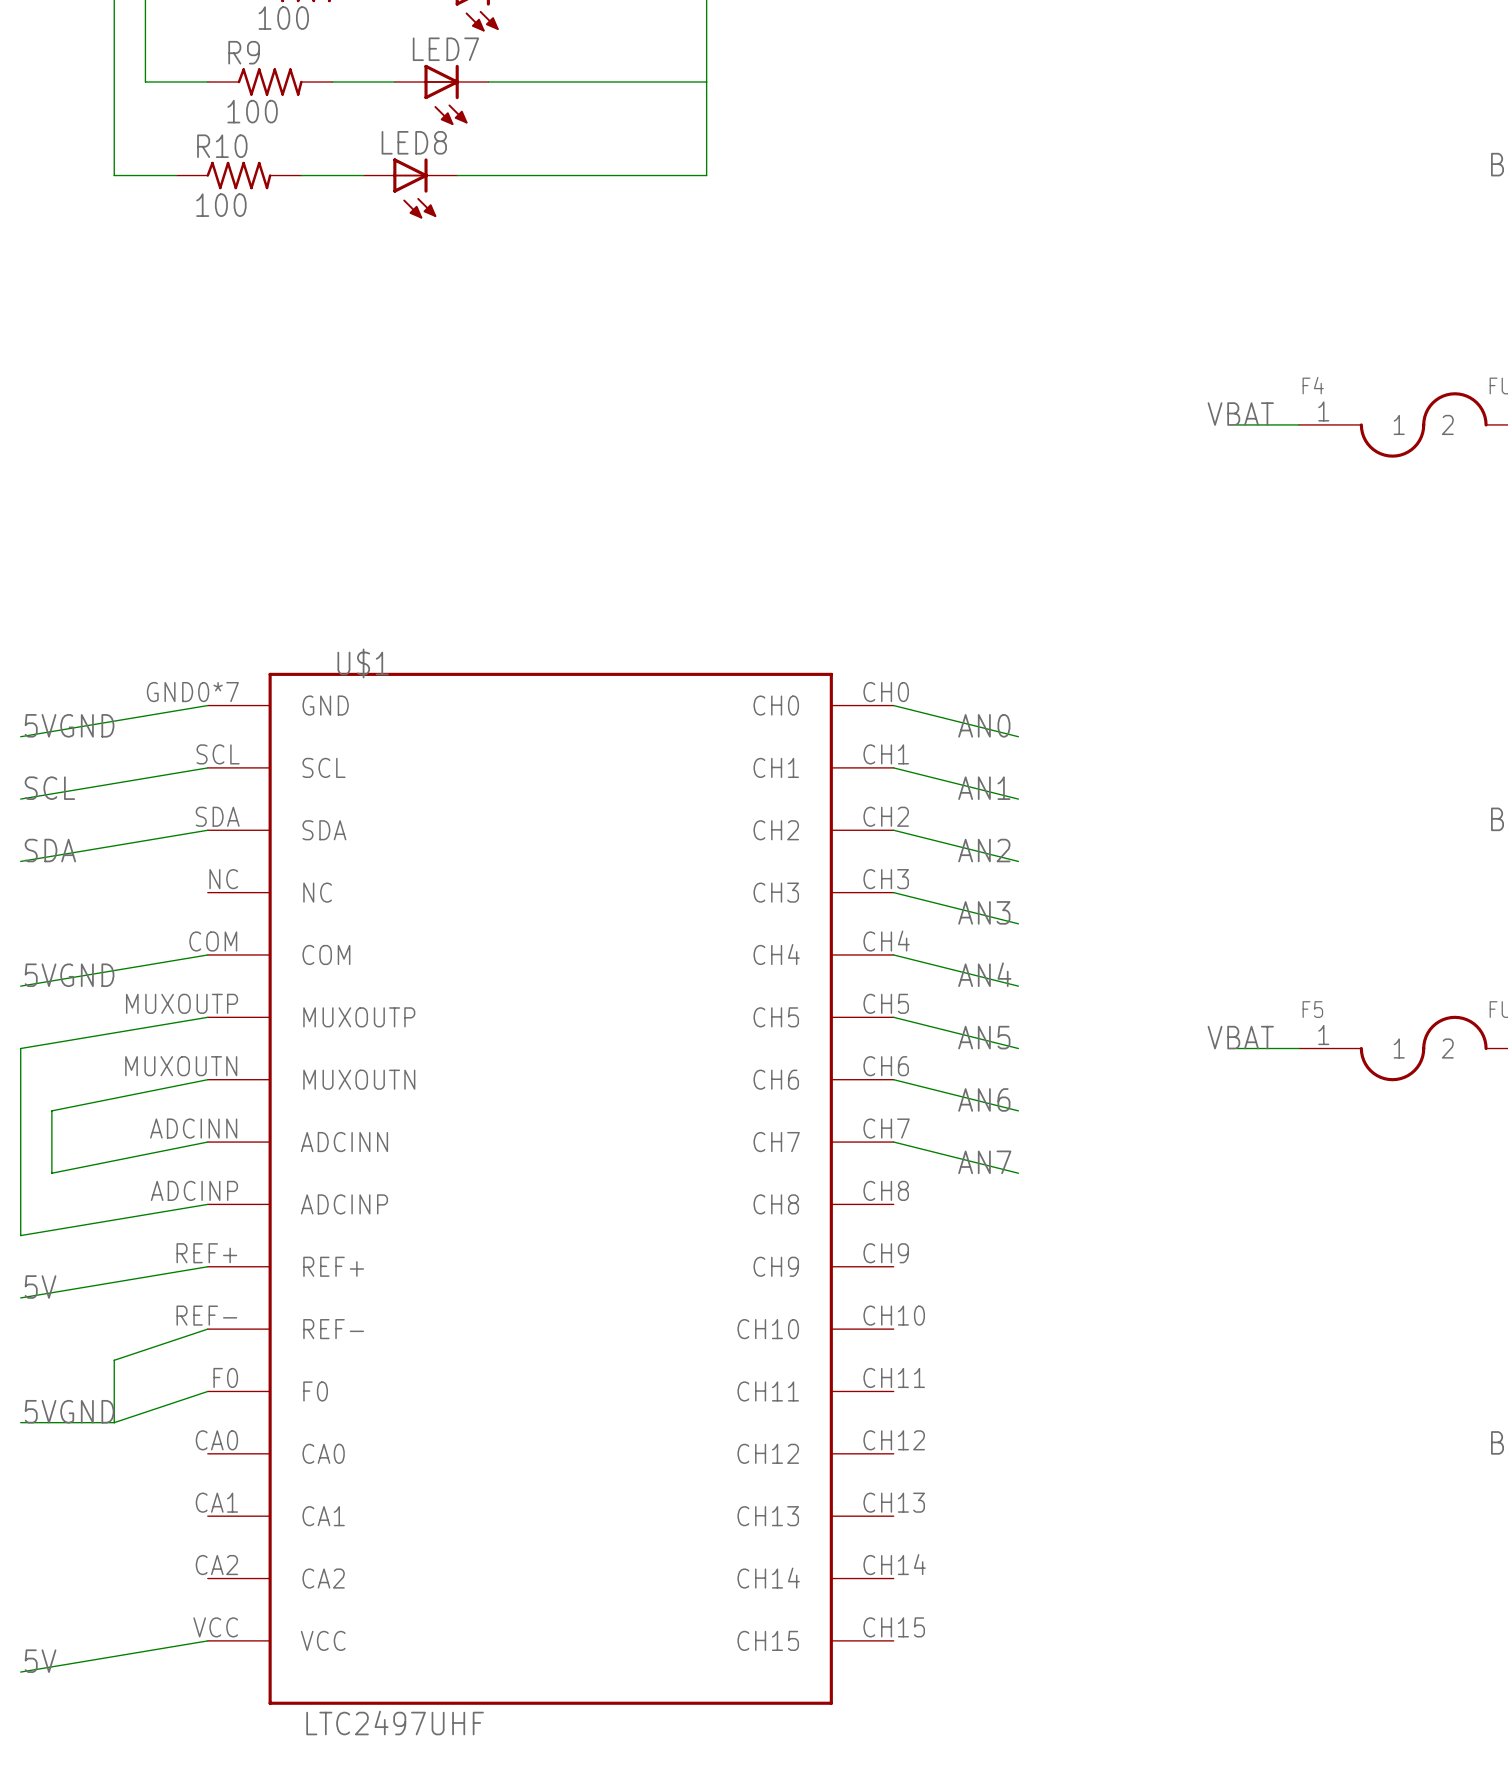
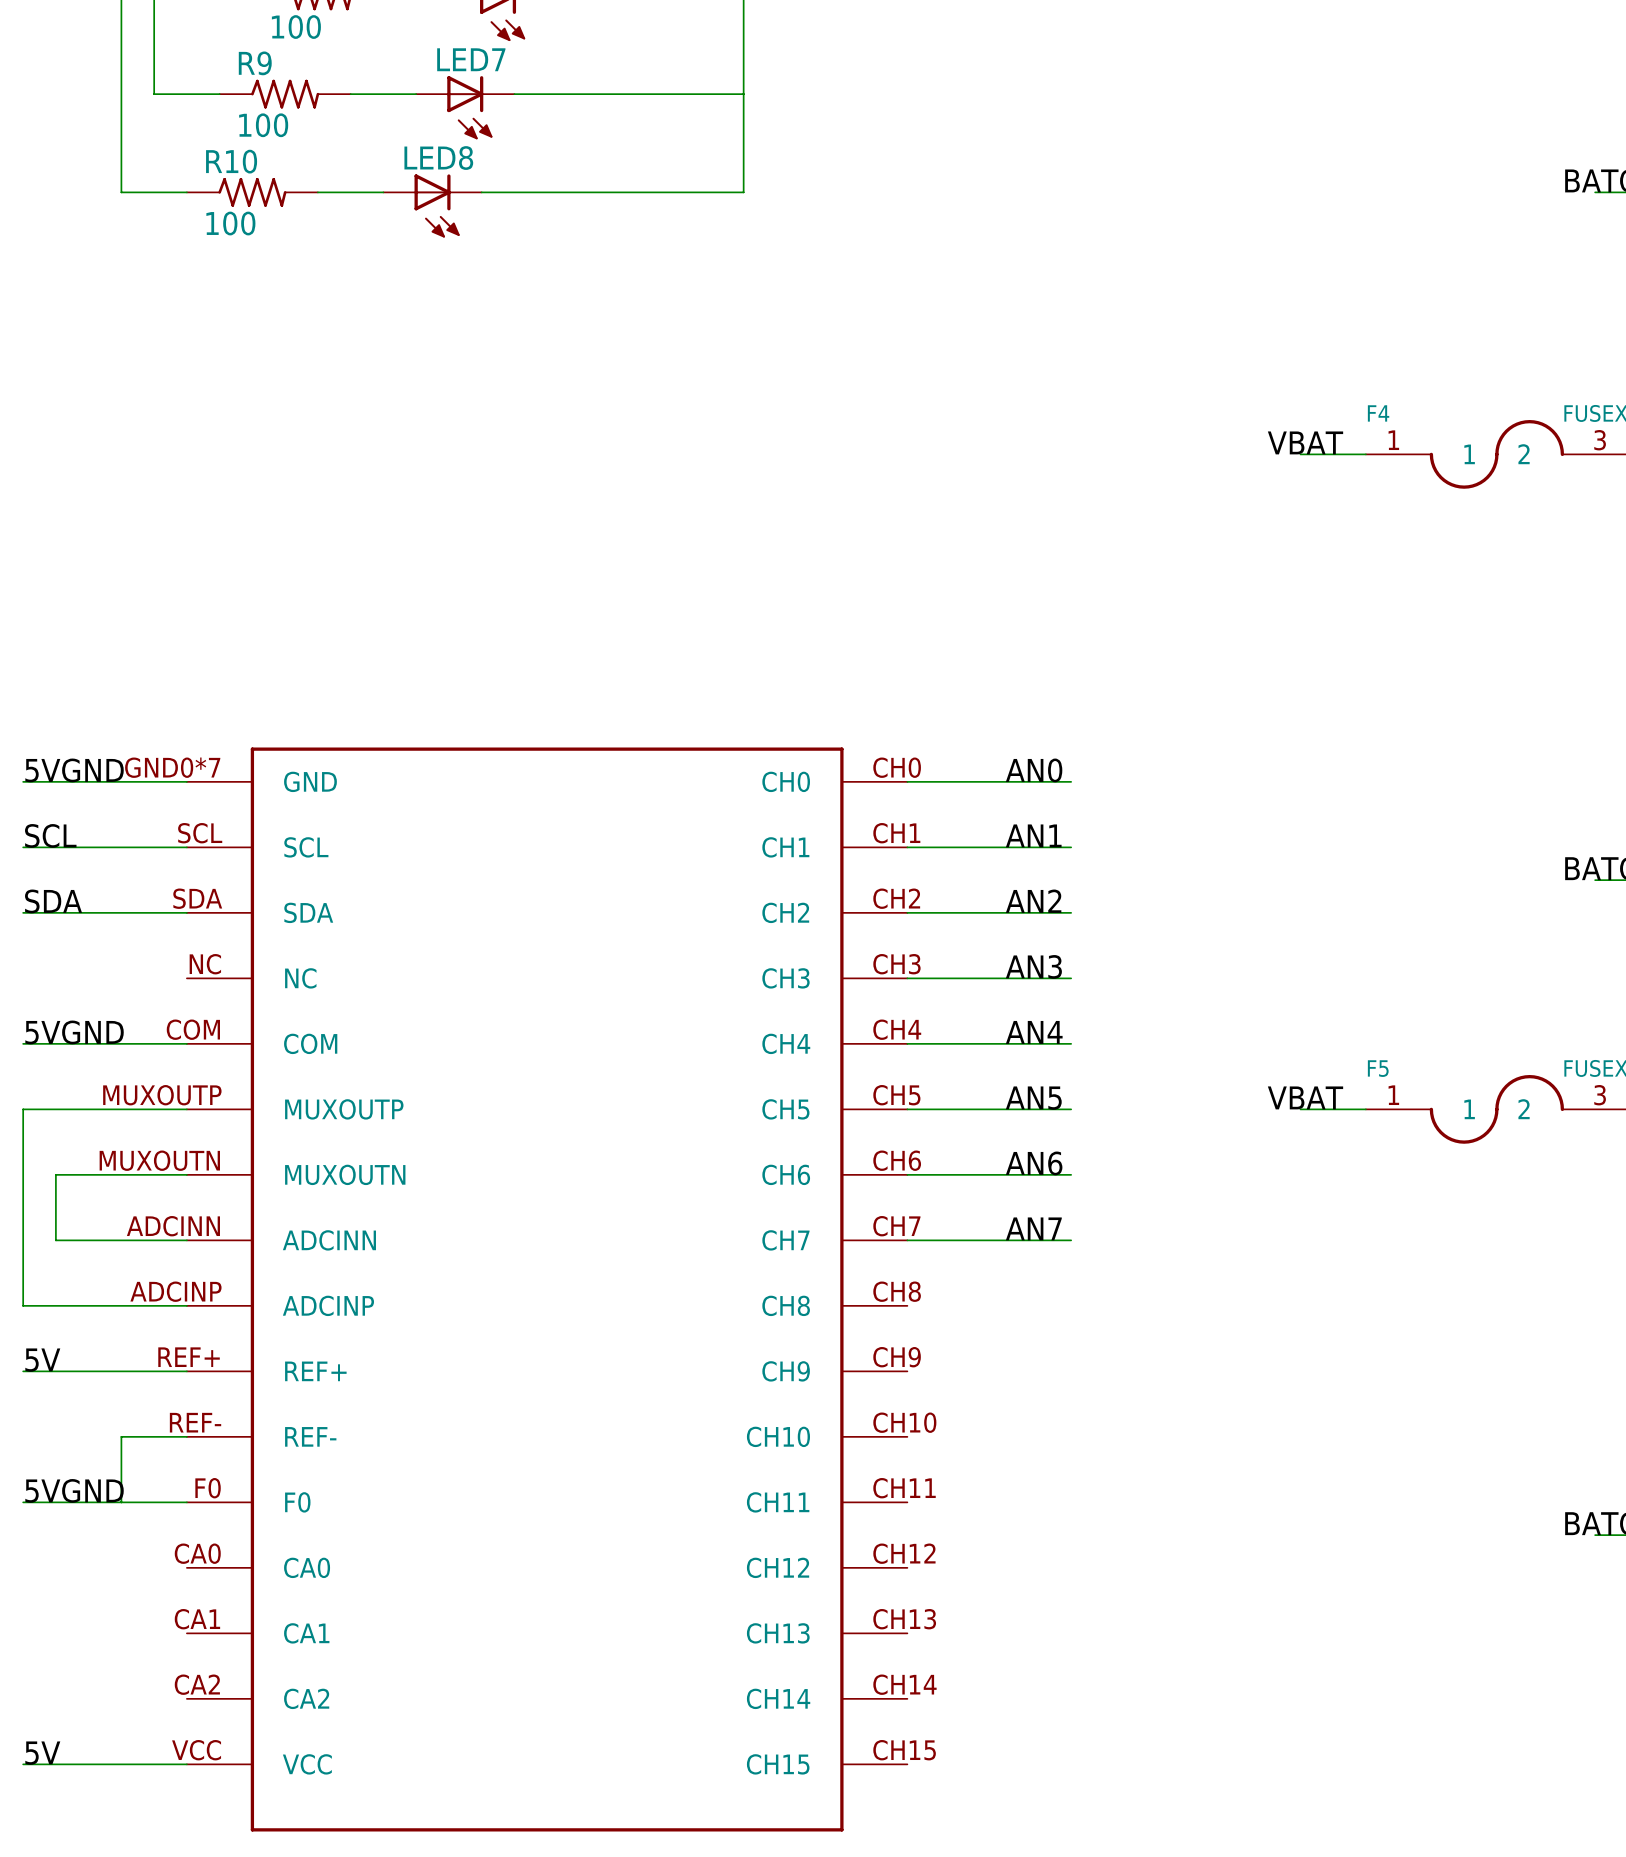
wire: (207, 705) (20, 736) -> (186, 781) (23, 781)
wire: (893, 705) (1018, 736) -> (907, 781) (1071, 781)
wire: (207, 767) (20, 799) -> (186, 847) (23, 847)
wire: (893, 767) (1018, 799) -> (907, 847) (1071, 847)
wire: (207, 830) (20, 861) -> (186, 912) (23, 912)
wire: (893, 830) (1018, 861) -> (907, 912) (1071, 912)
wire: (893, 892) (1018, 923) -> (907, 978) (1071, 978)
wire: (207, 954) (20, 986) -> (186, 1043) (23, 1043)
wire: (893, 954) (1018, 986) -> (907, 1043) (1071, 1043)
wire: (207, 1017) (20, 1048) -> (186, 1109) (23, 1109)
wire: (893, 1017) (1018, 1048) -> (907, 1109) (1071, 1109)
wire: (207, 1079) (51, 1110) -> (186, 1174) (55, 1174)
wire: (893, 1079) (1018, 1110) -> (907, 1174) (1071, 1174)
wire: (207, 1142) (51, 1173) -> (186, 1240) (55, 1240)
wire: (893, 1142) (1018, 1173) -> (907, 1240) (1071, 1240)
U$1: LTC2497UHF (550, 1188) -> none
wire: (207, 1204) (20, 1235) -> (186, 1305) (23, 1305)
part: none -> (547, 1289)
wire: (207, 1266) (20, 1297) -> (186, 1371) (23, 1371)
wire: (207, 1329) (114, 1360) -> (186, 1436) (121, 1436)
wire: (207, 1391) (114, 1422) -> (186, 1502) (121, 1502)
wire: (207, 1640) (20, 1672) -> (186, 1764) (23, 1764)

